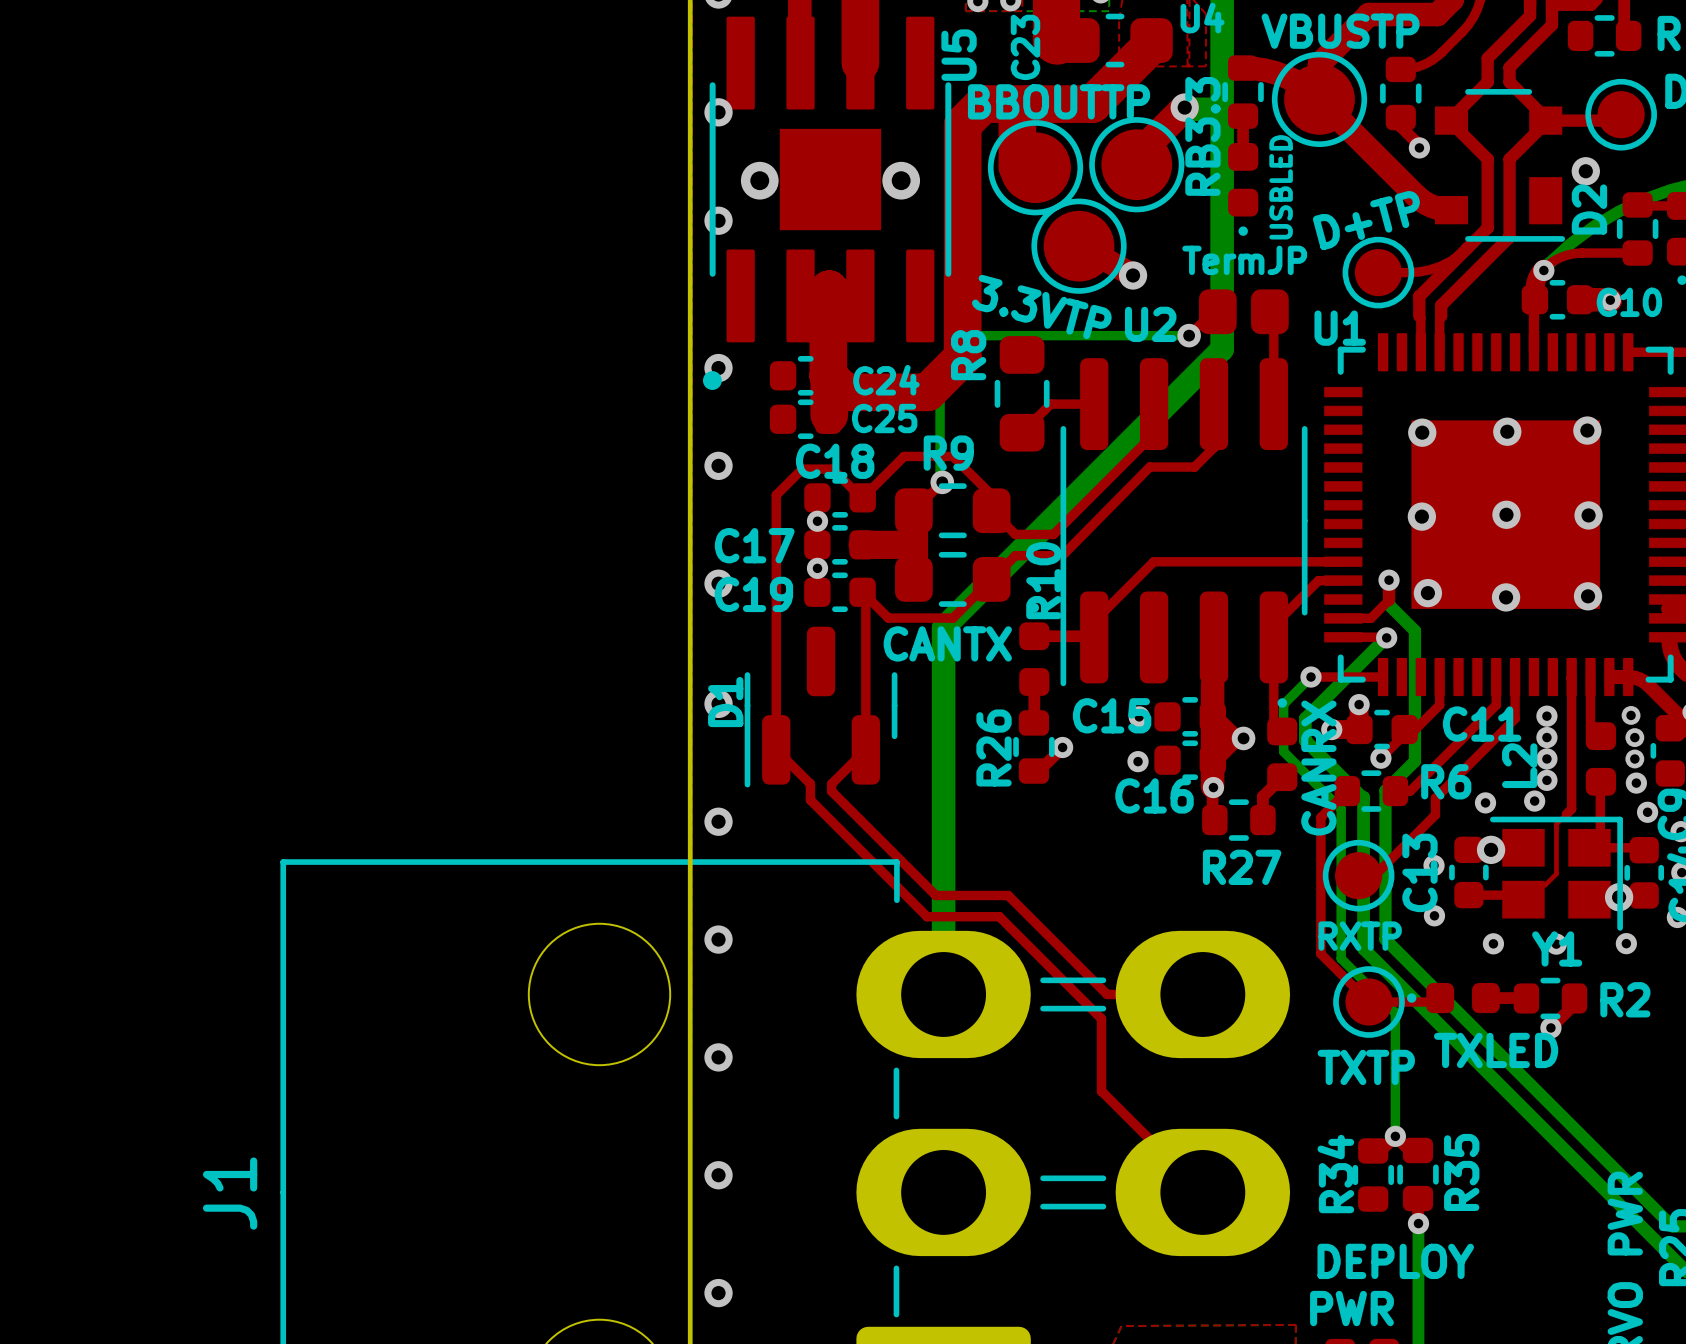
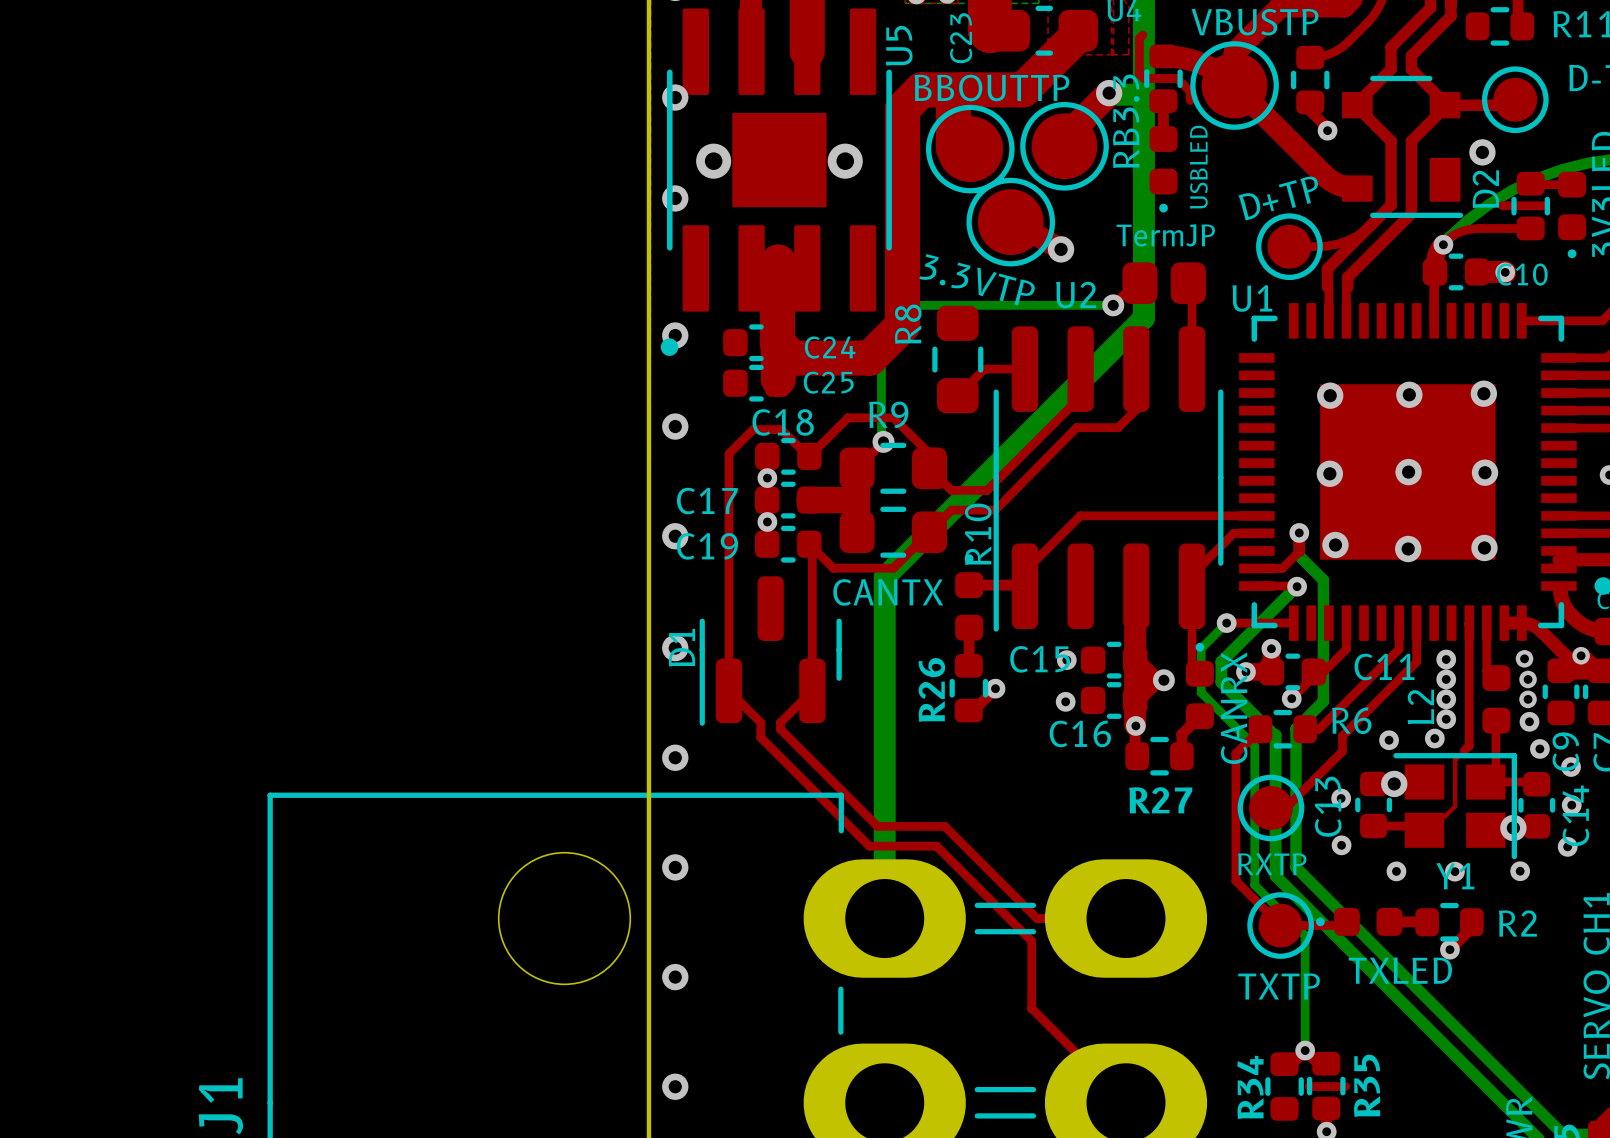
top track: none -> (1142, 35) (1139, 38) (1139, 73) (1144, 78) (1177, 78) (1190, 91) (1190, 100)
top track: none -> (1502, 205) (1543, 205)
top track: none -> (1308, 1086) (1345, 1086)

